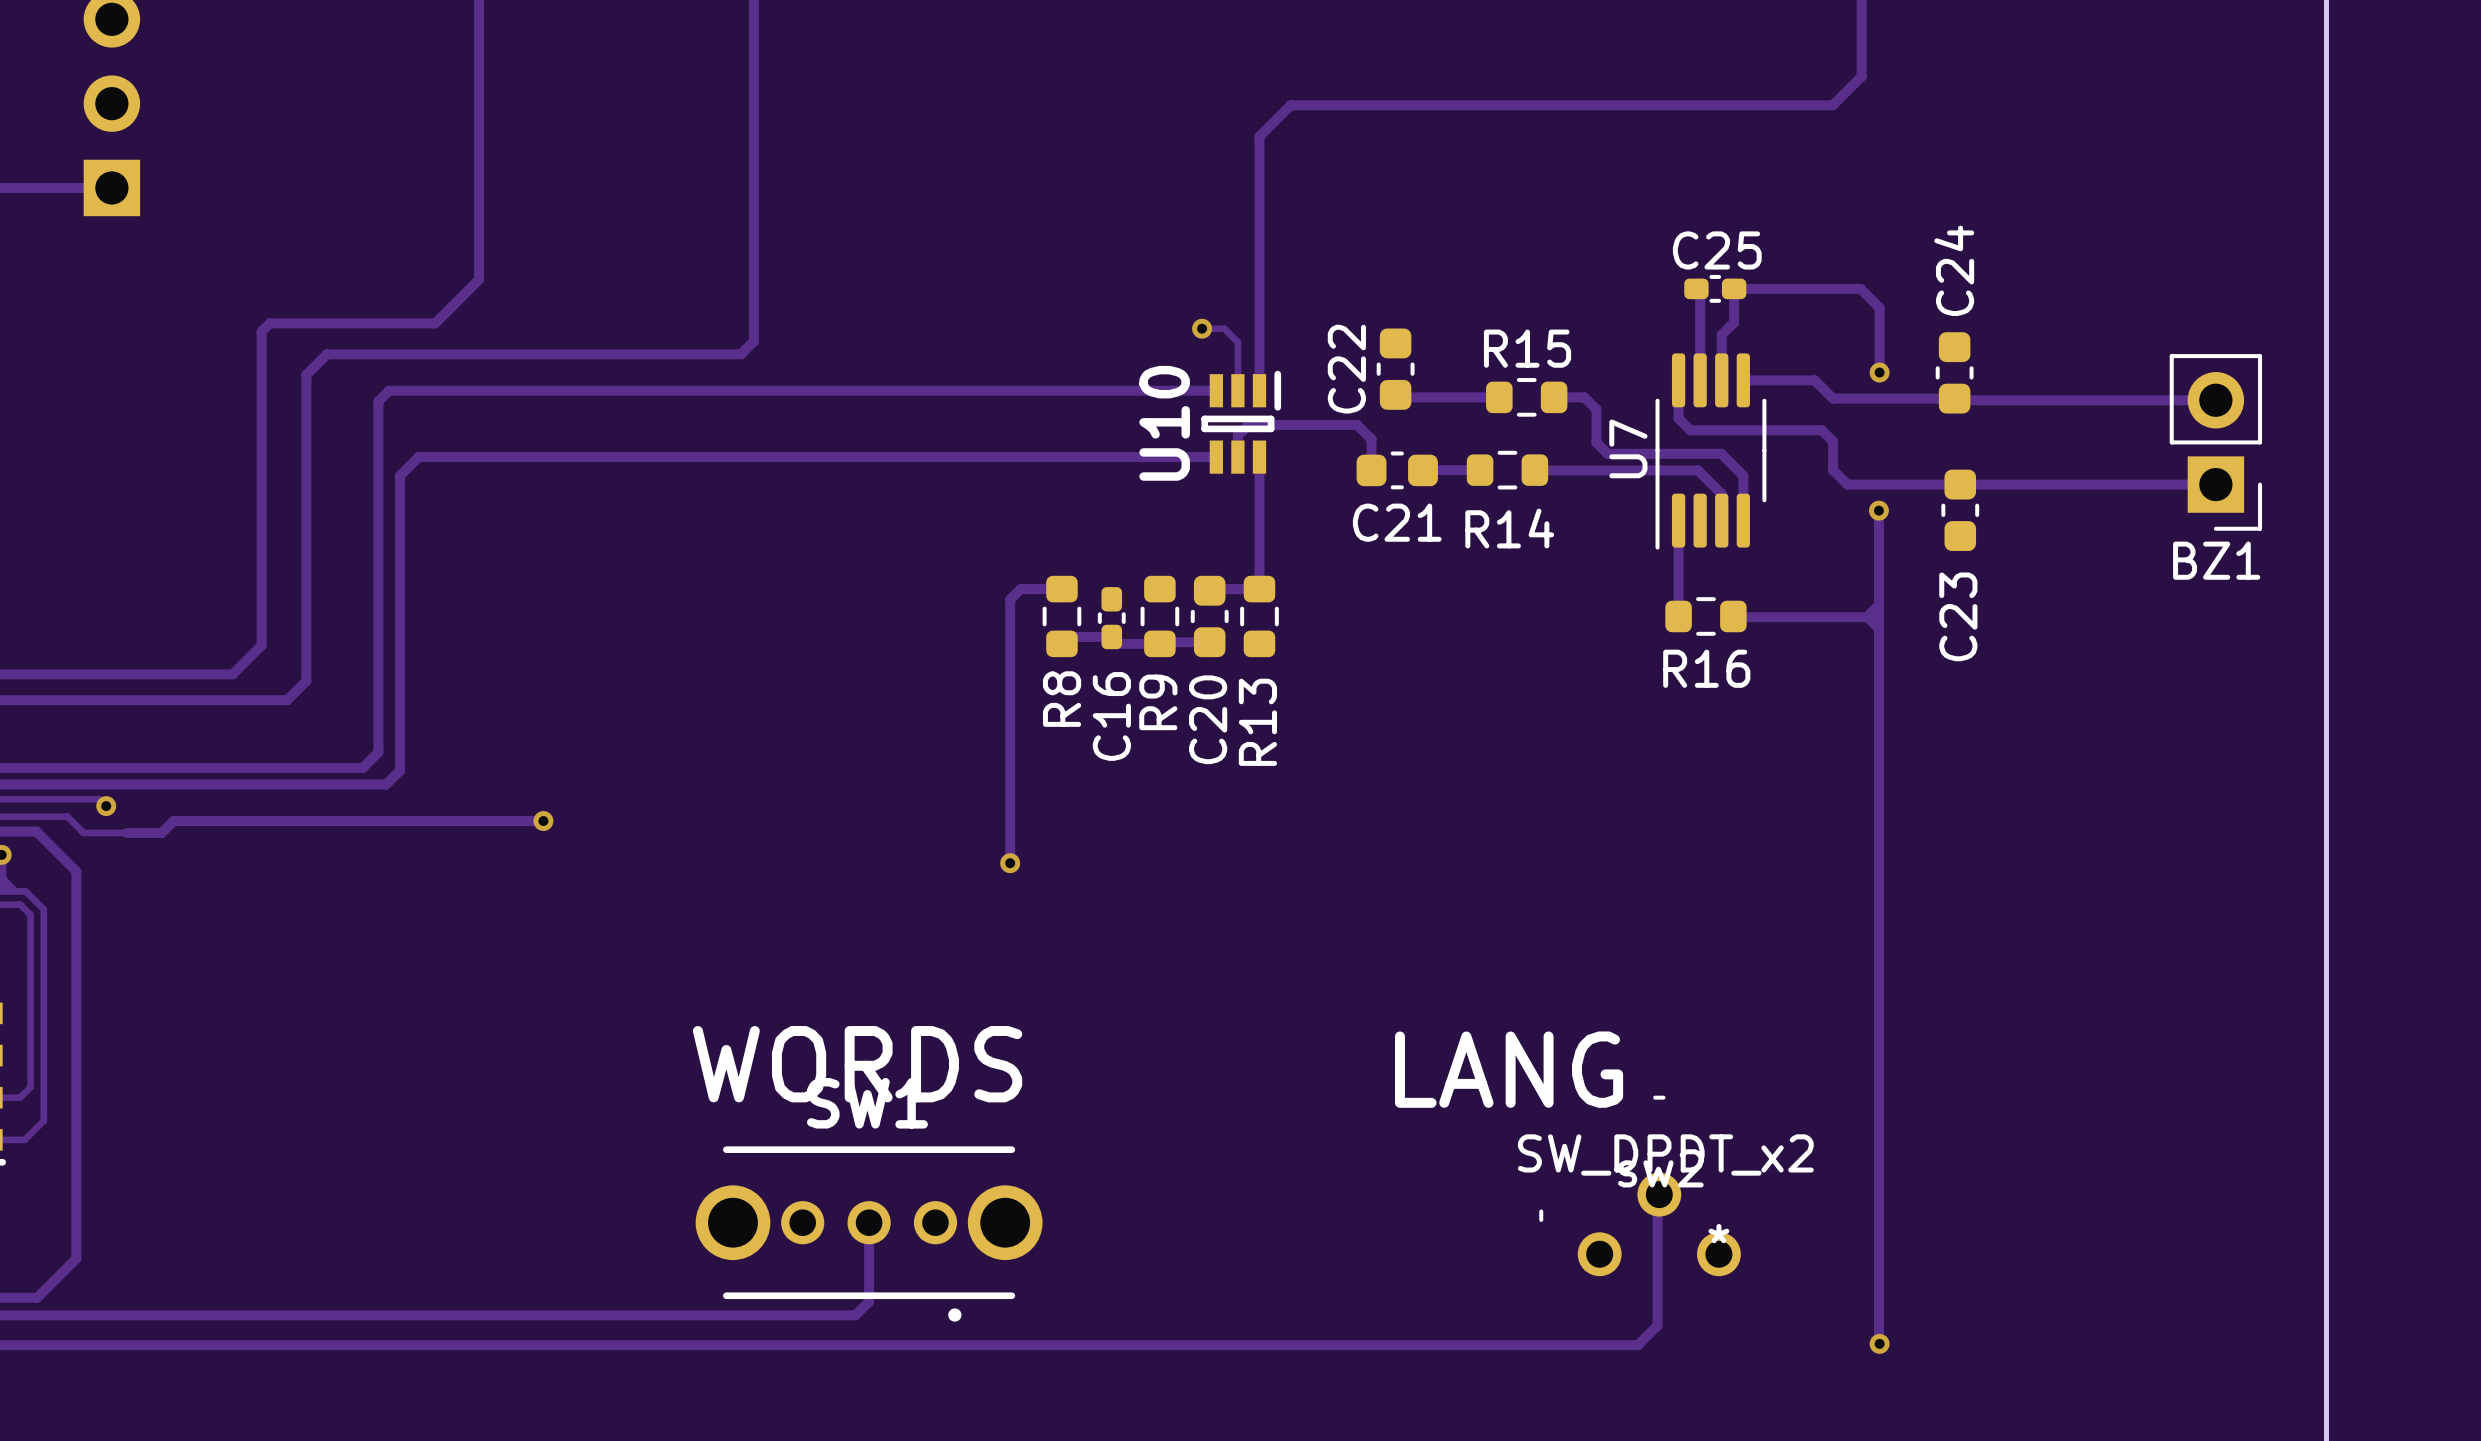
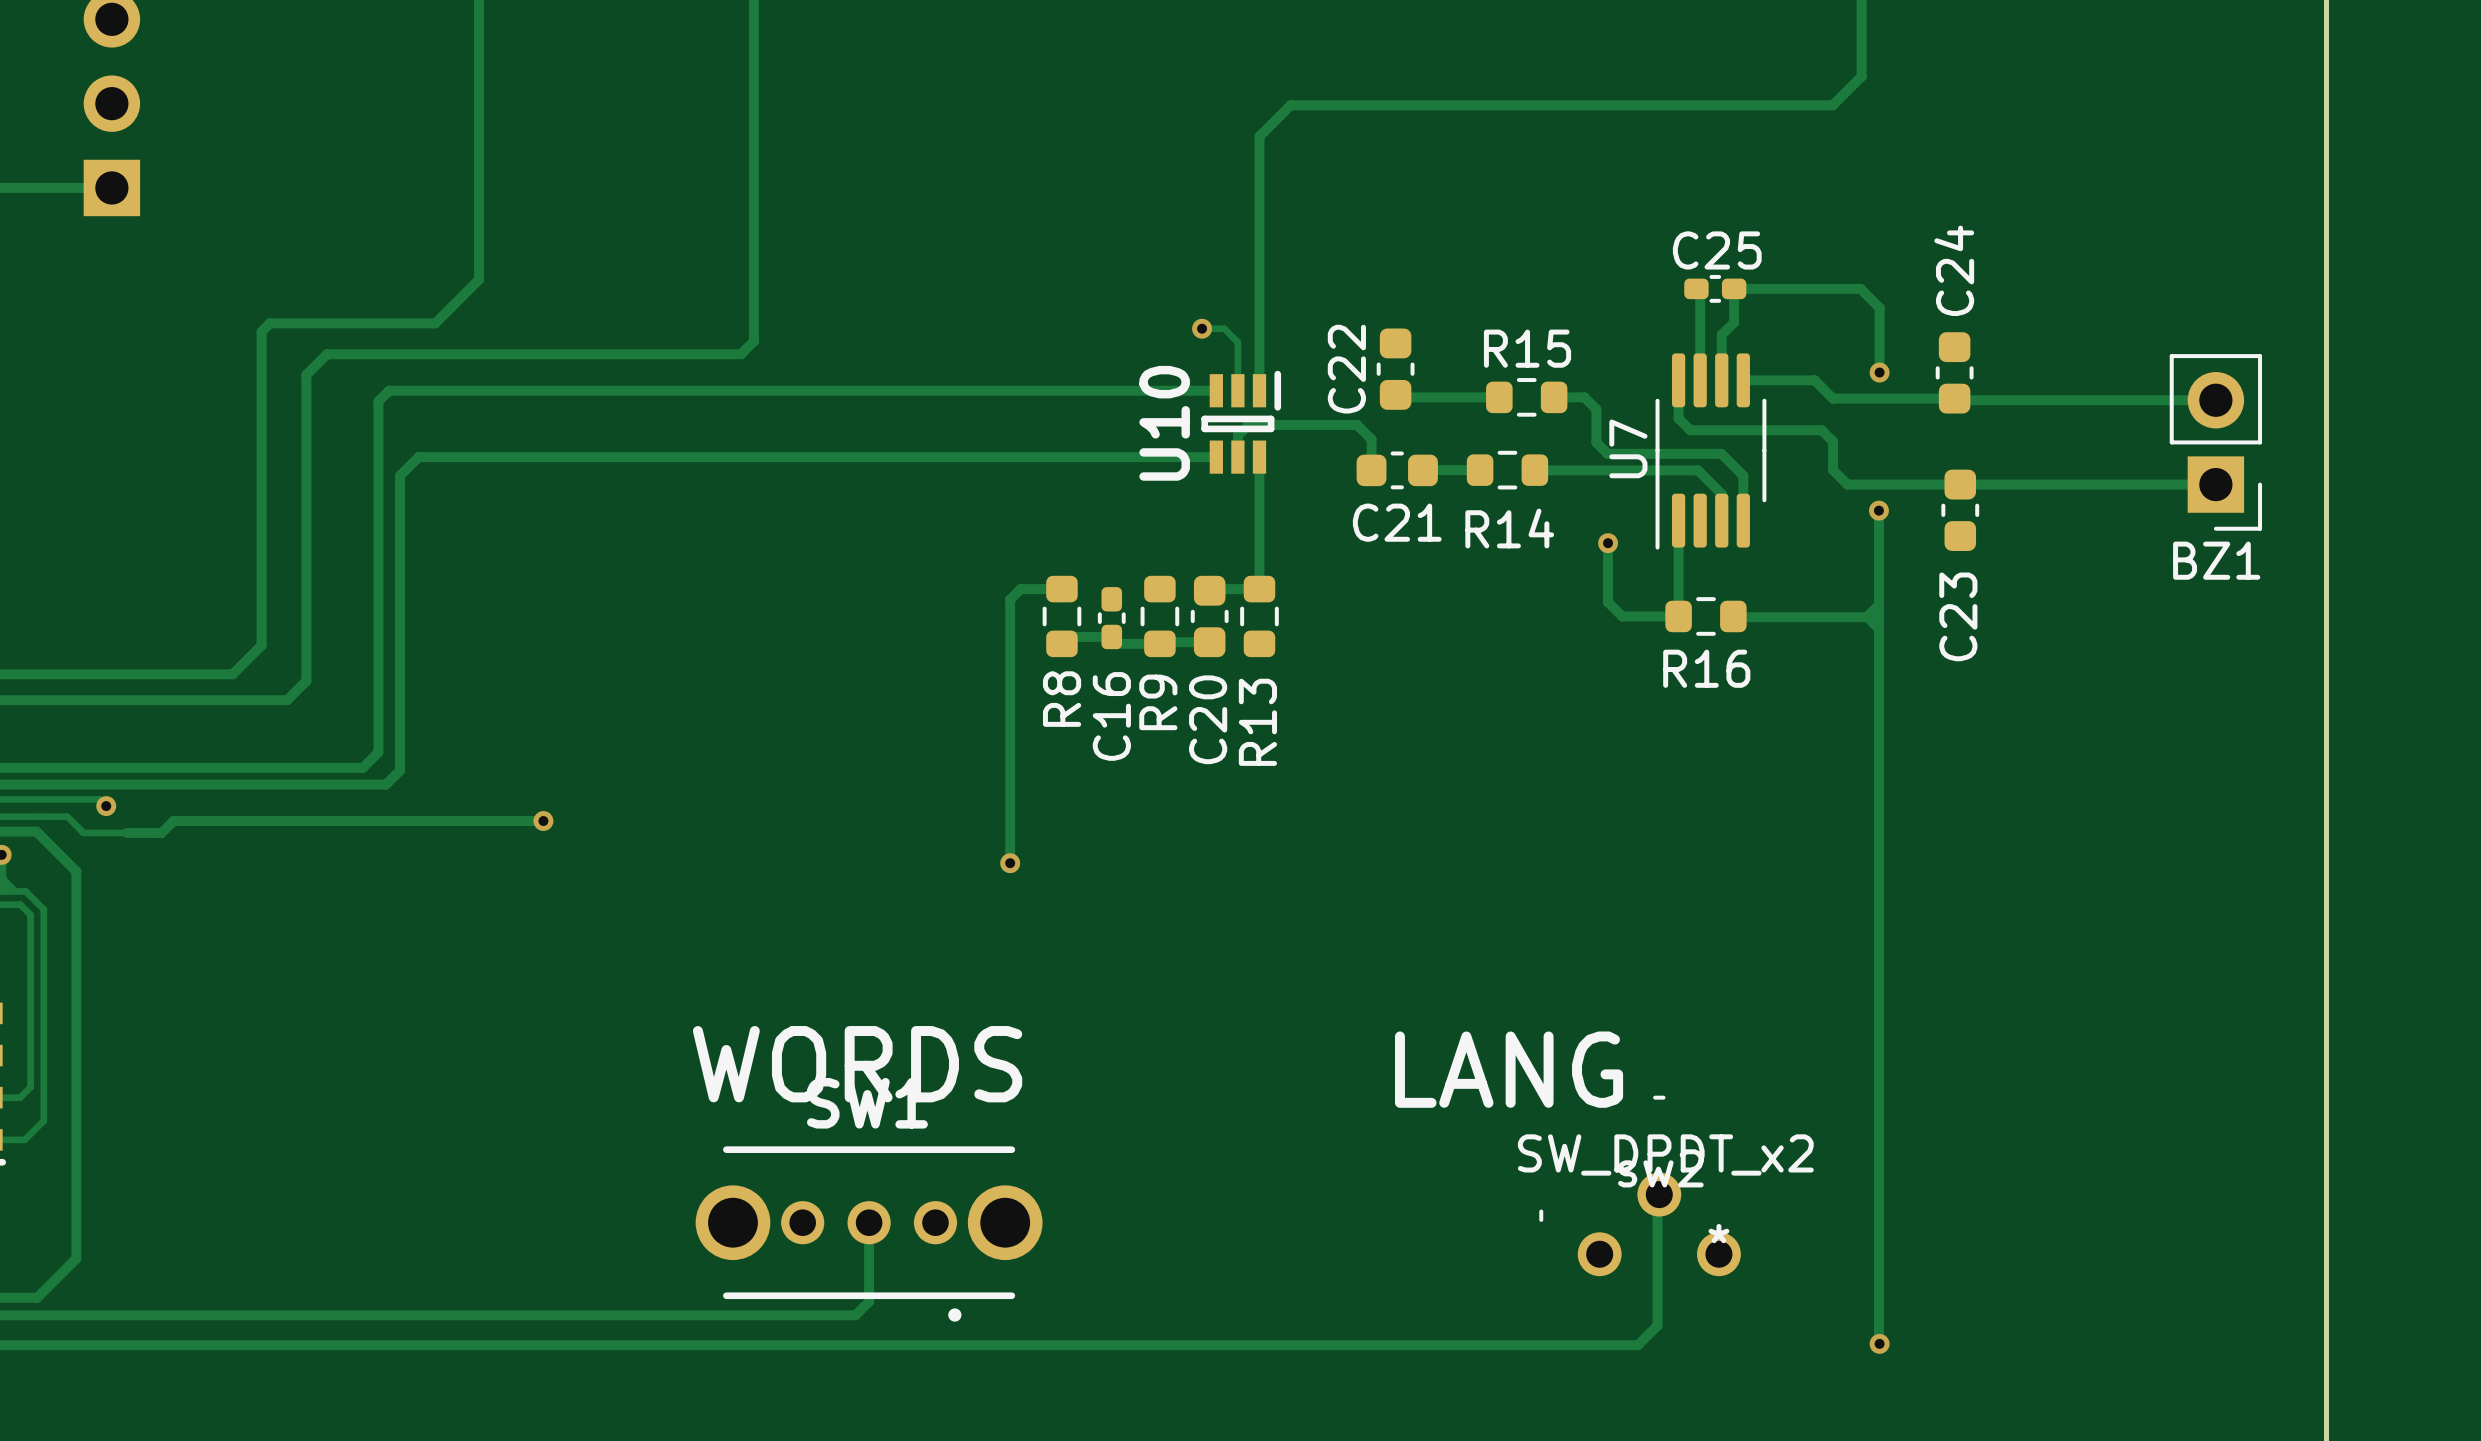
track: none -> (1608, 543) (1608, 602) (1622, 616) (1678, 616)
via: none -> (1608, 543)

